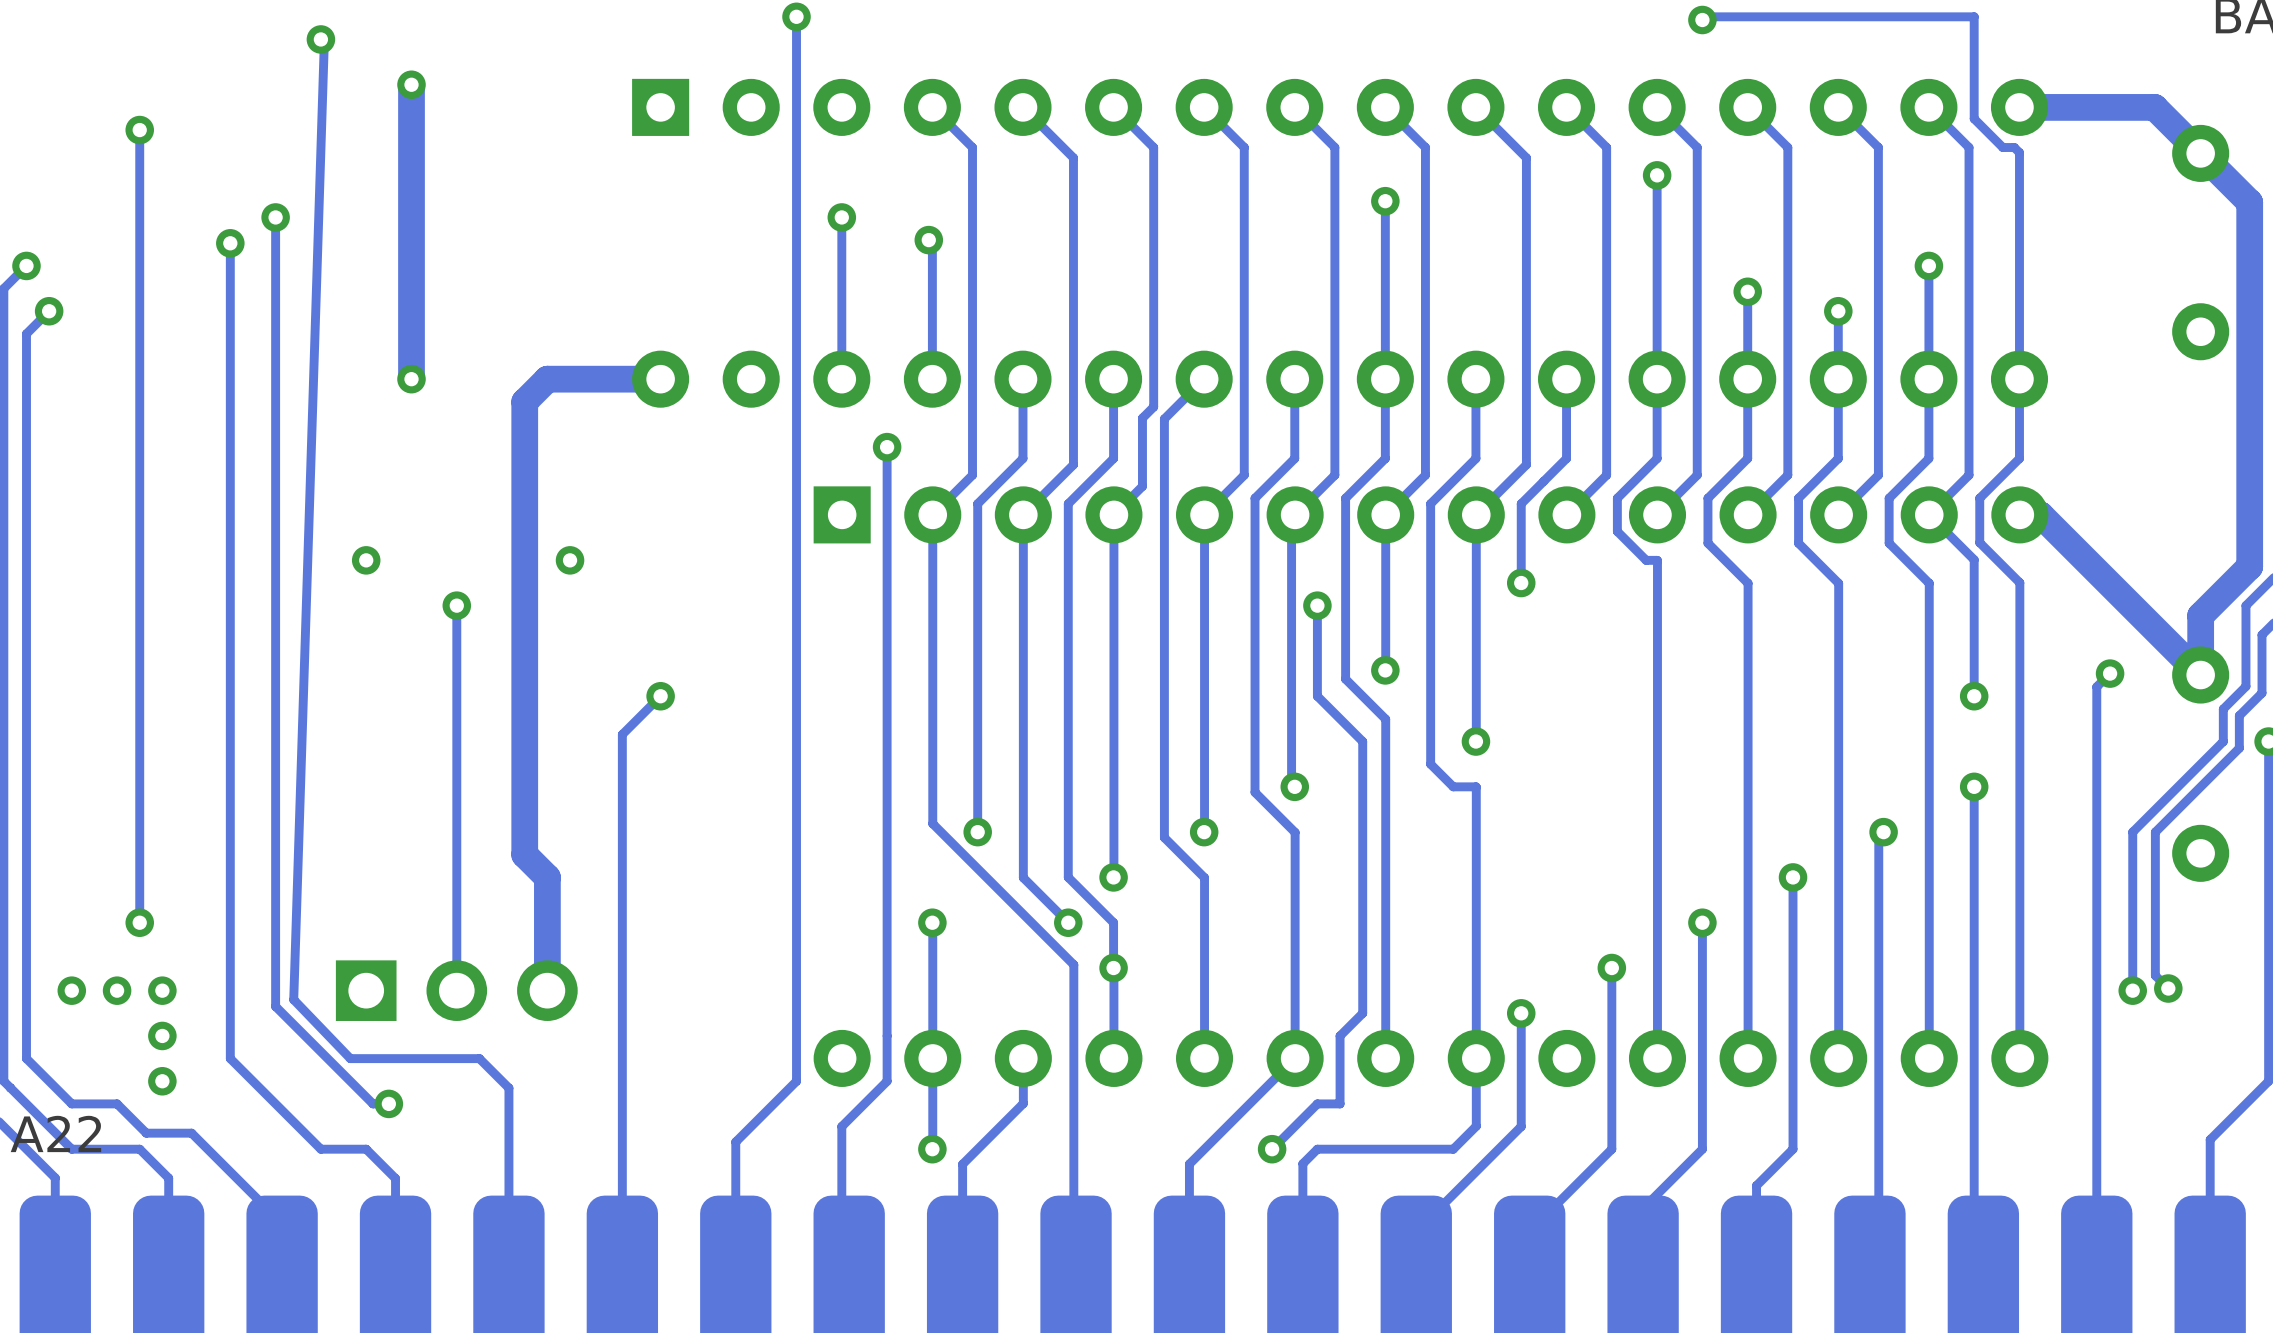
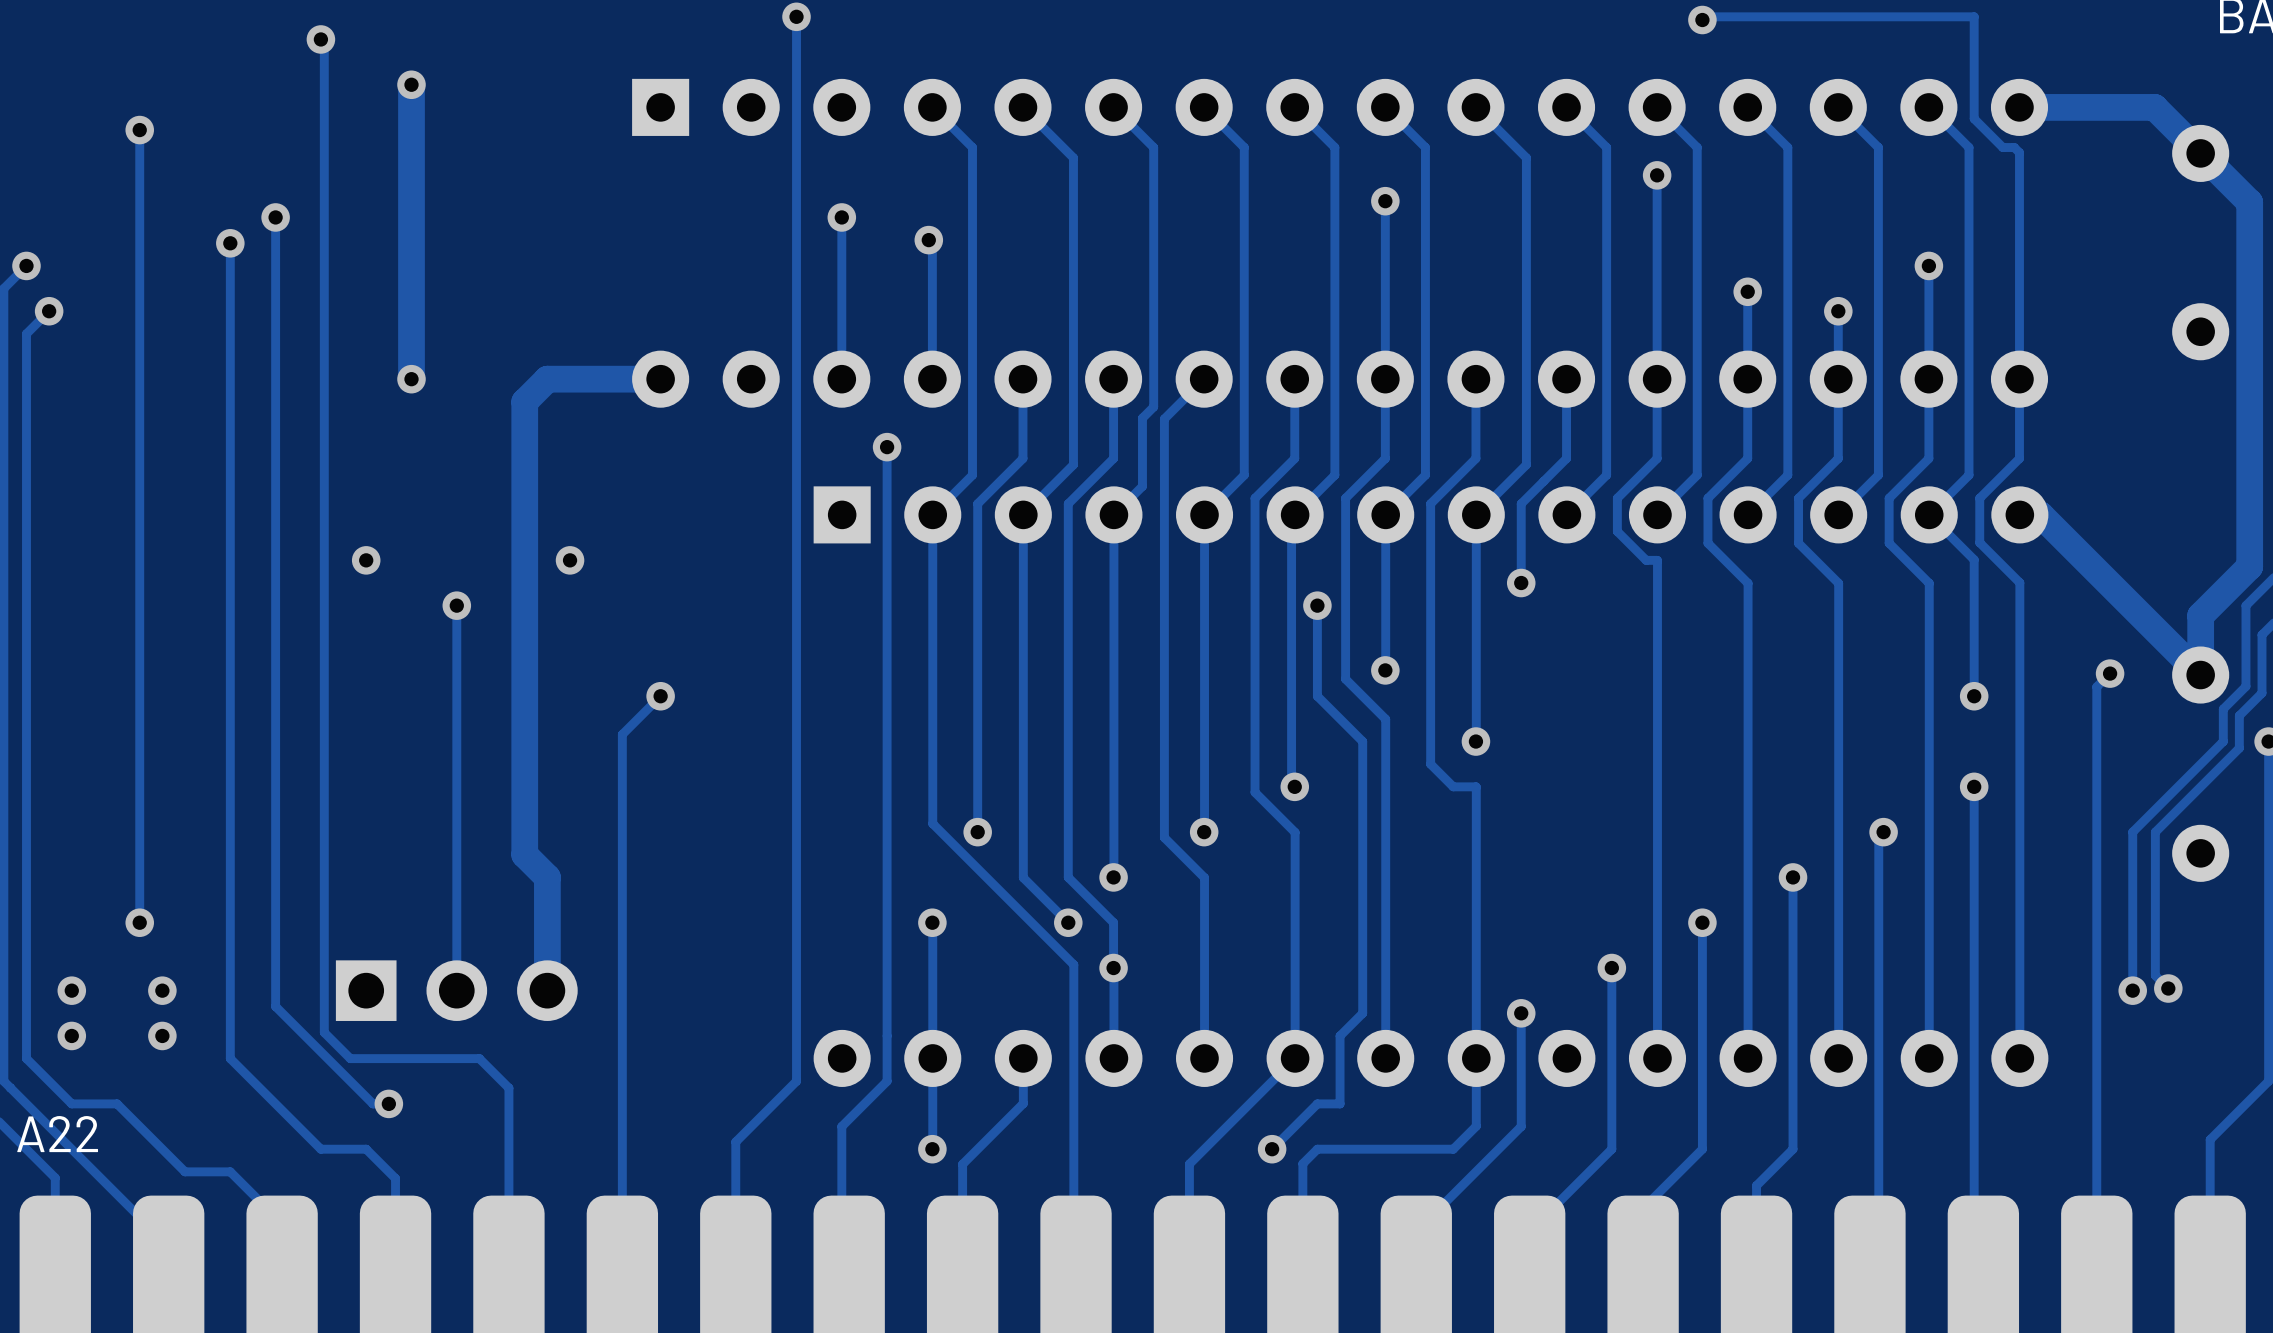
track: (324, 42) (293, 999) (350, 1058) -> (324, 42) (324, 1032) (350, 1058)
via: (117, 990) -> none
via: none -> (71, 1035)
via: (162, 1081) -> none
track: (146, 1133) (191, 1133) (230, 1171) -> (146, 1133) (185, 1171) (230, 1171)
track: (71, 1149) (139, 1149) (168, 1178) (168, 1246) -> (71, 1149) (168, 1246)

